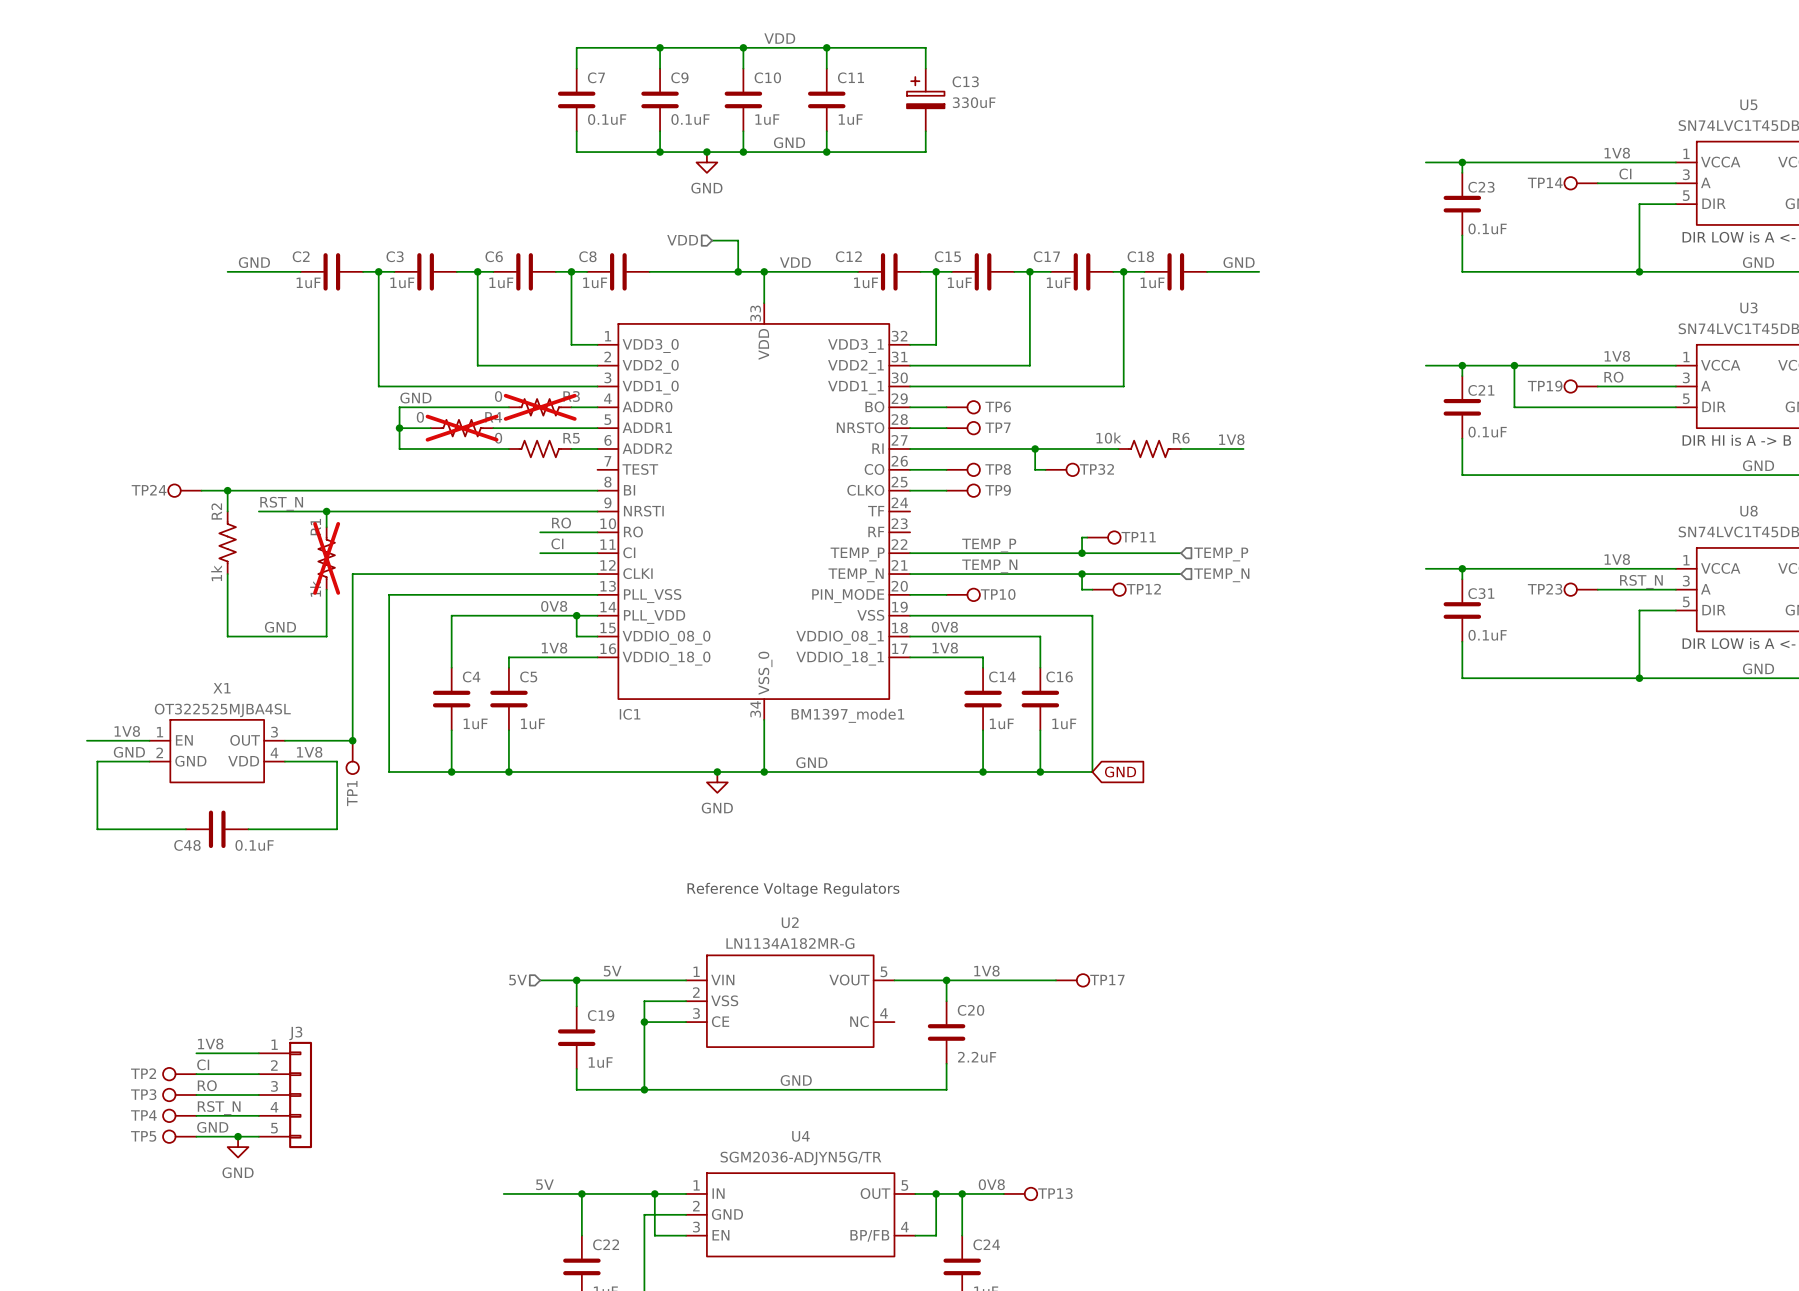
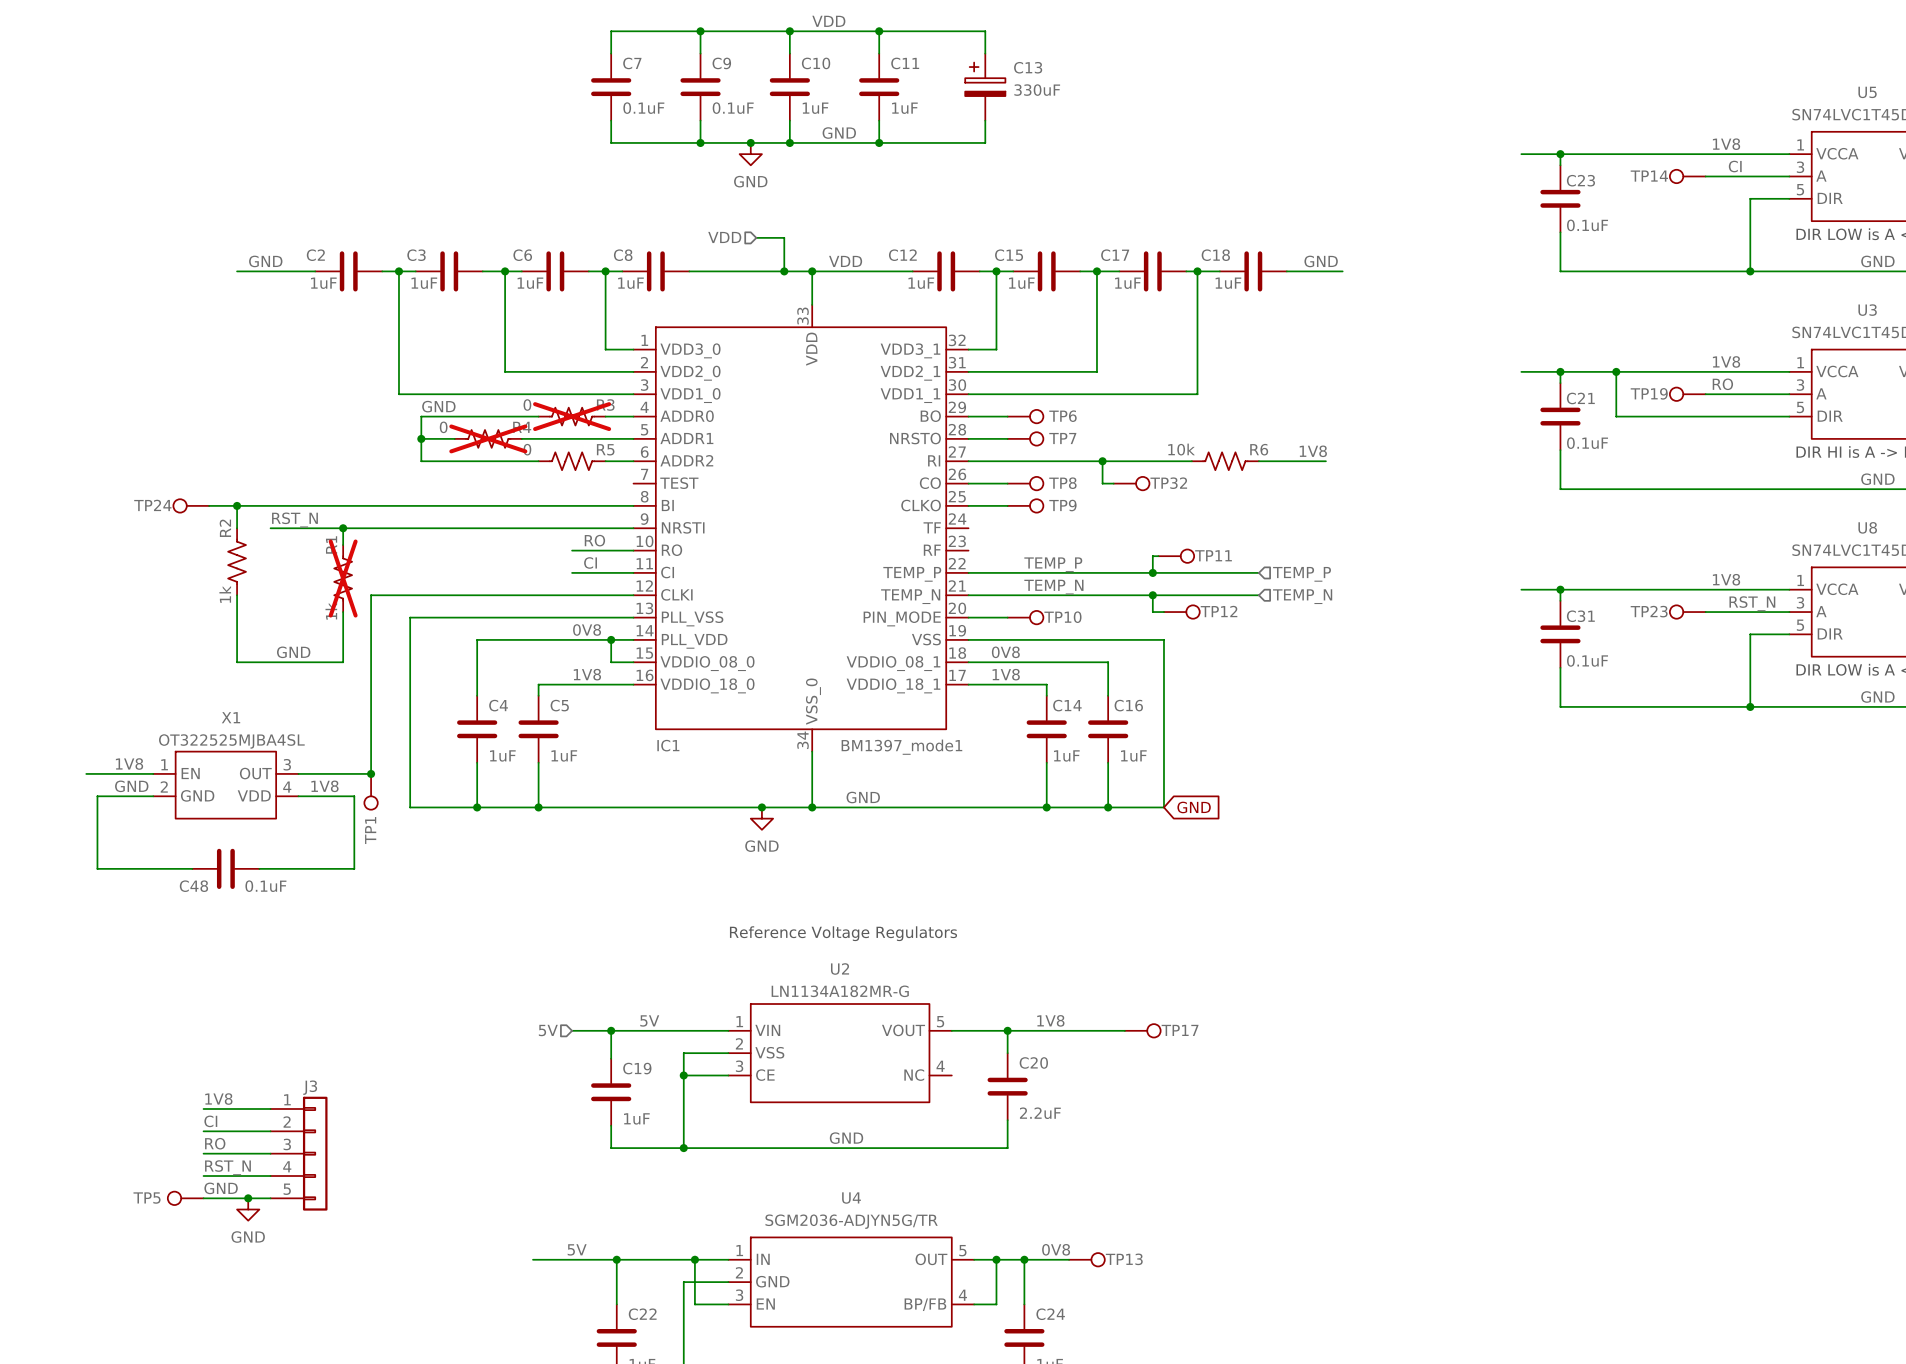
TP2: (179, 1074) -> none
TP3: (179, 1094) -> none
TP4: (179, 1115) -> none

